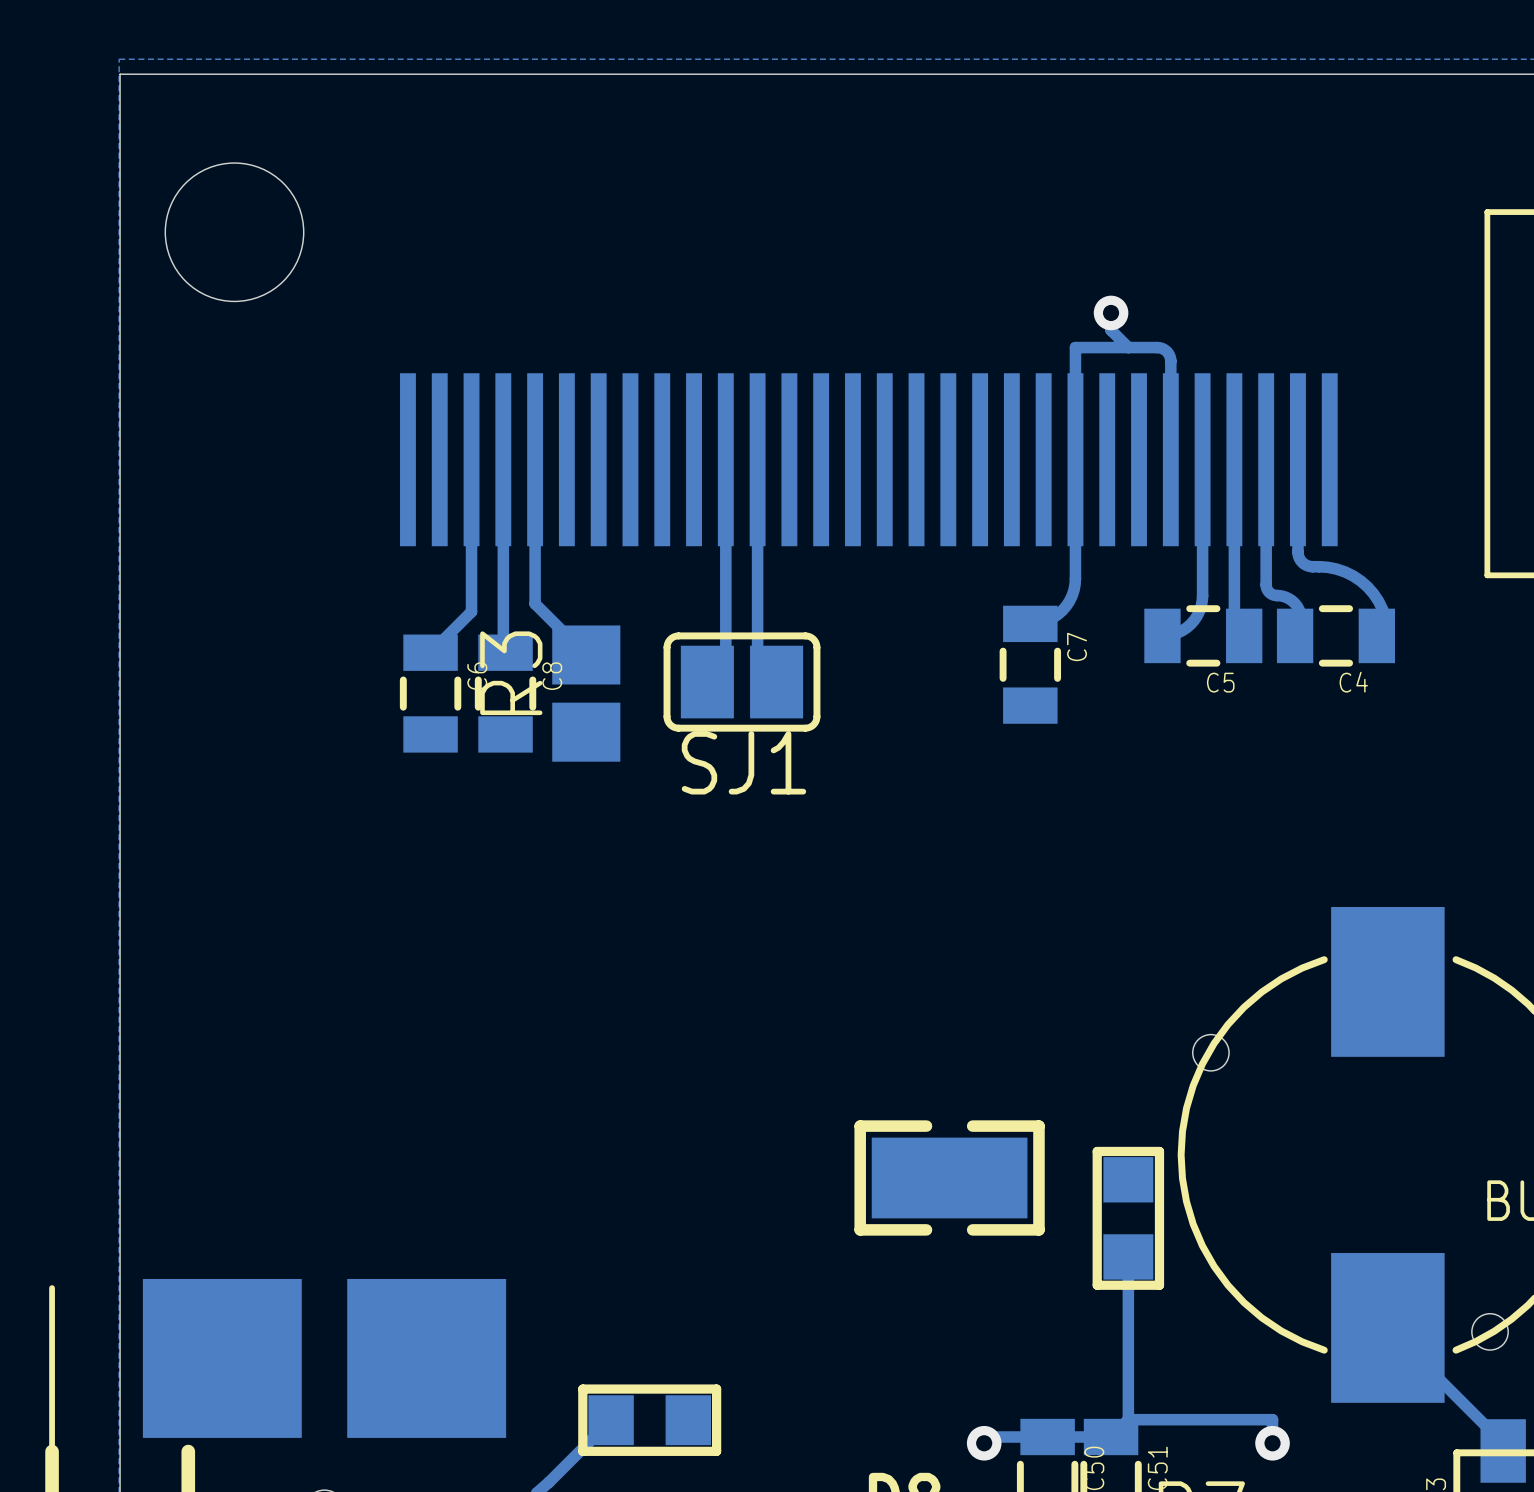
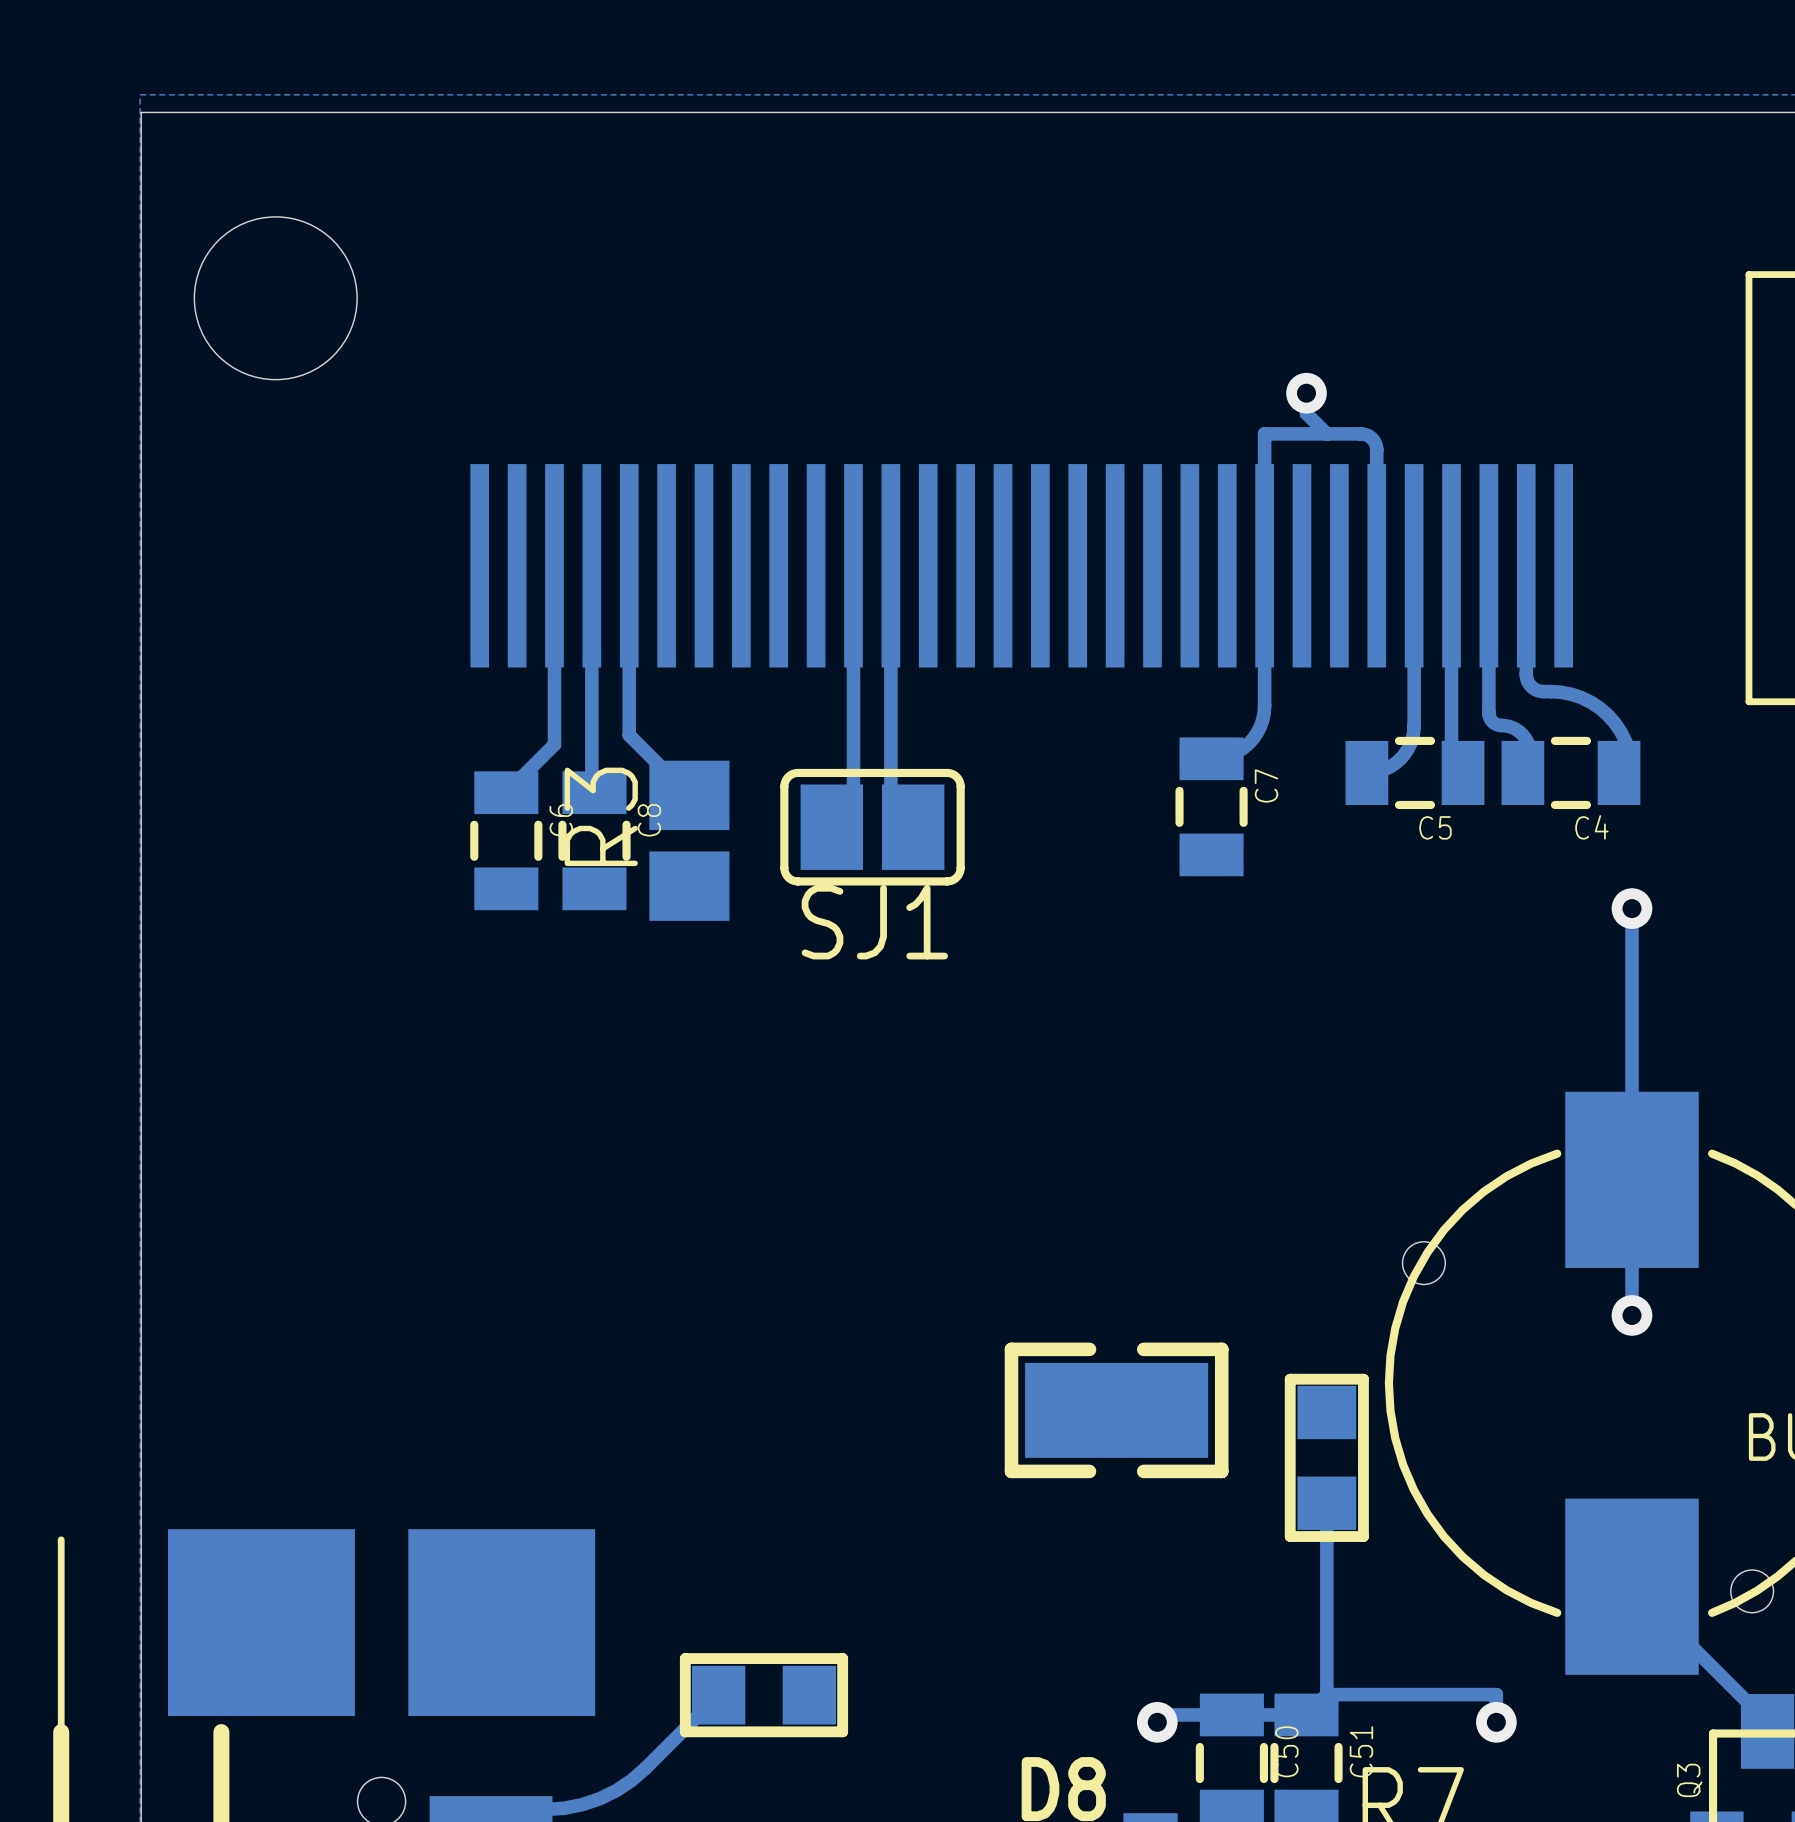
track: none -> (1632, 908) (1632, 1315)
via: none -> (1632, 908)
via: none -> (1632, 1315)

